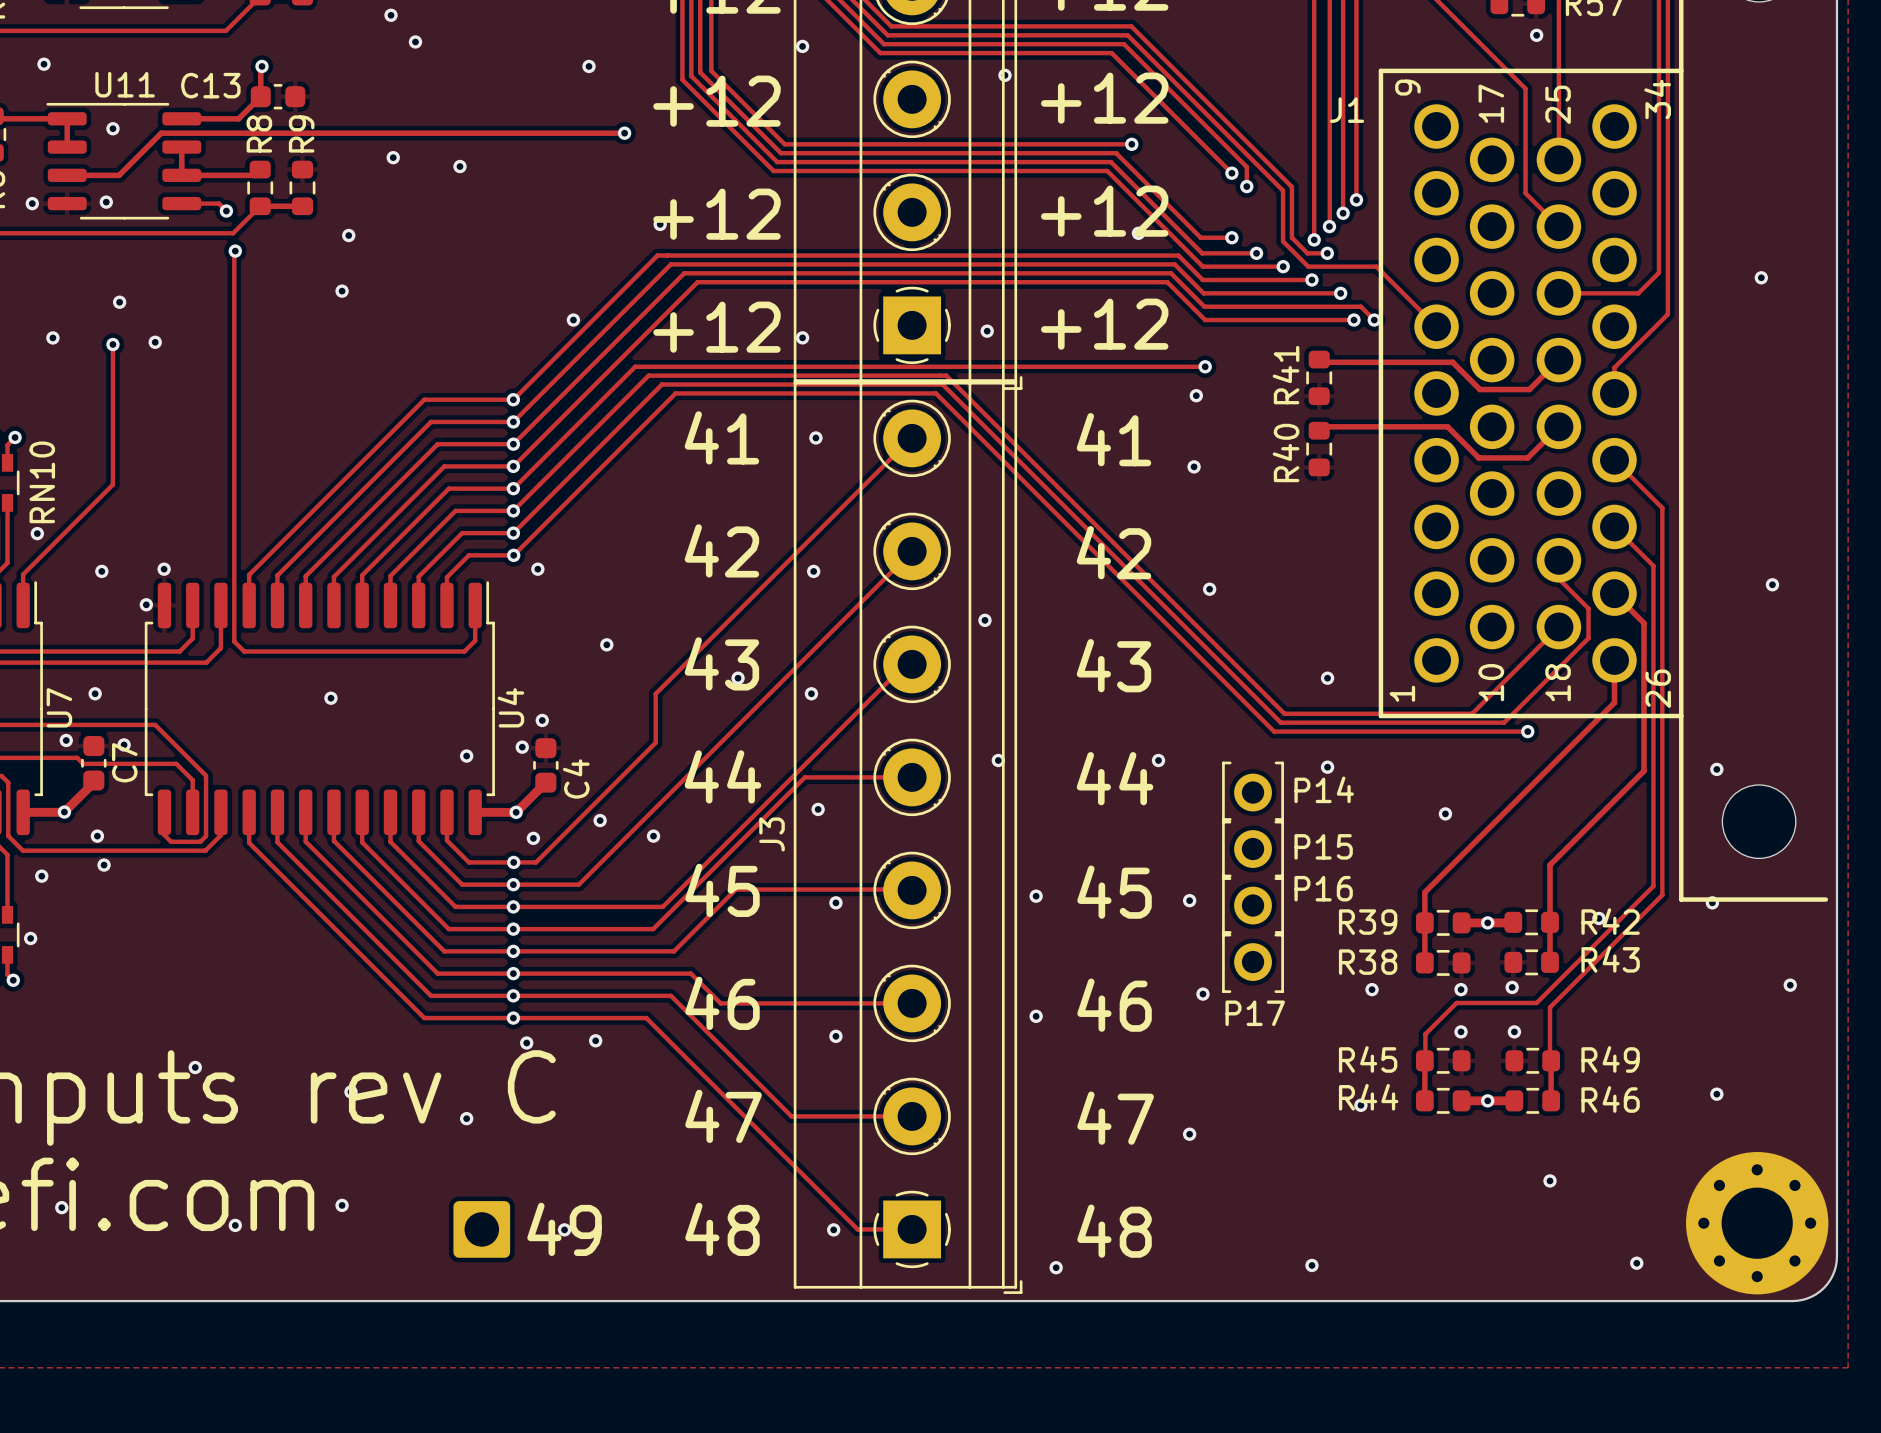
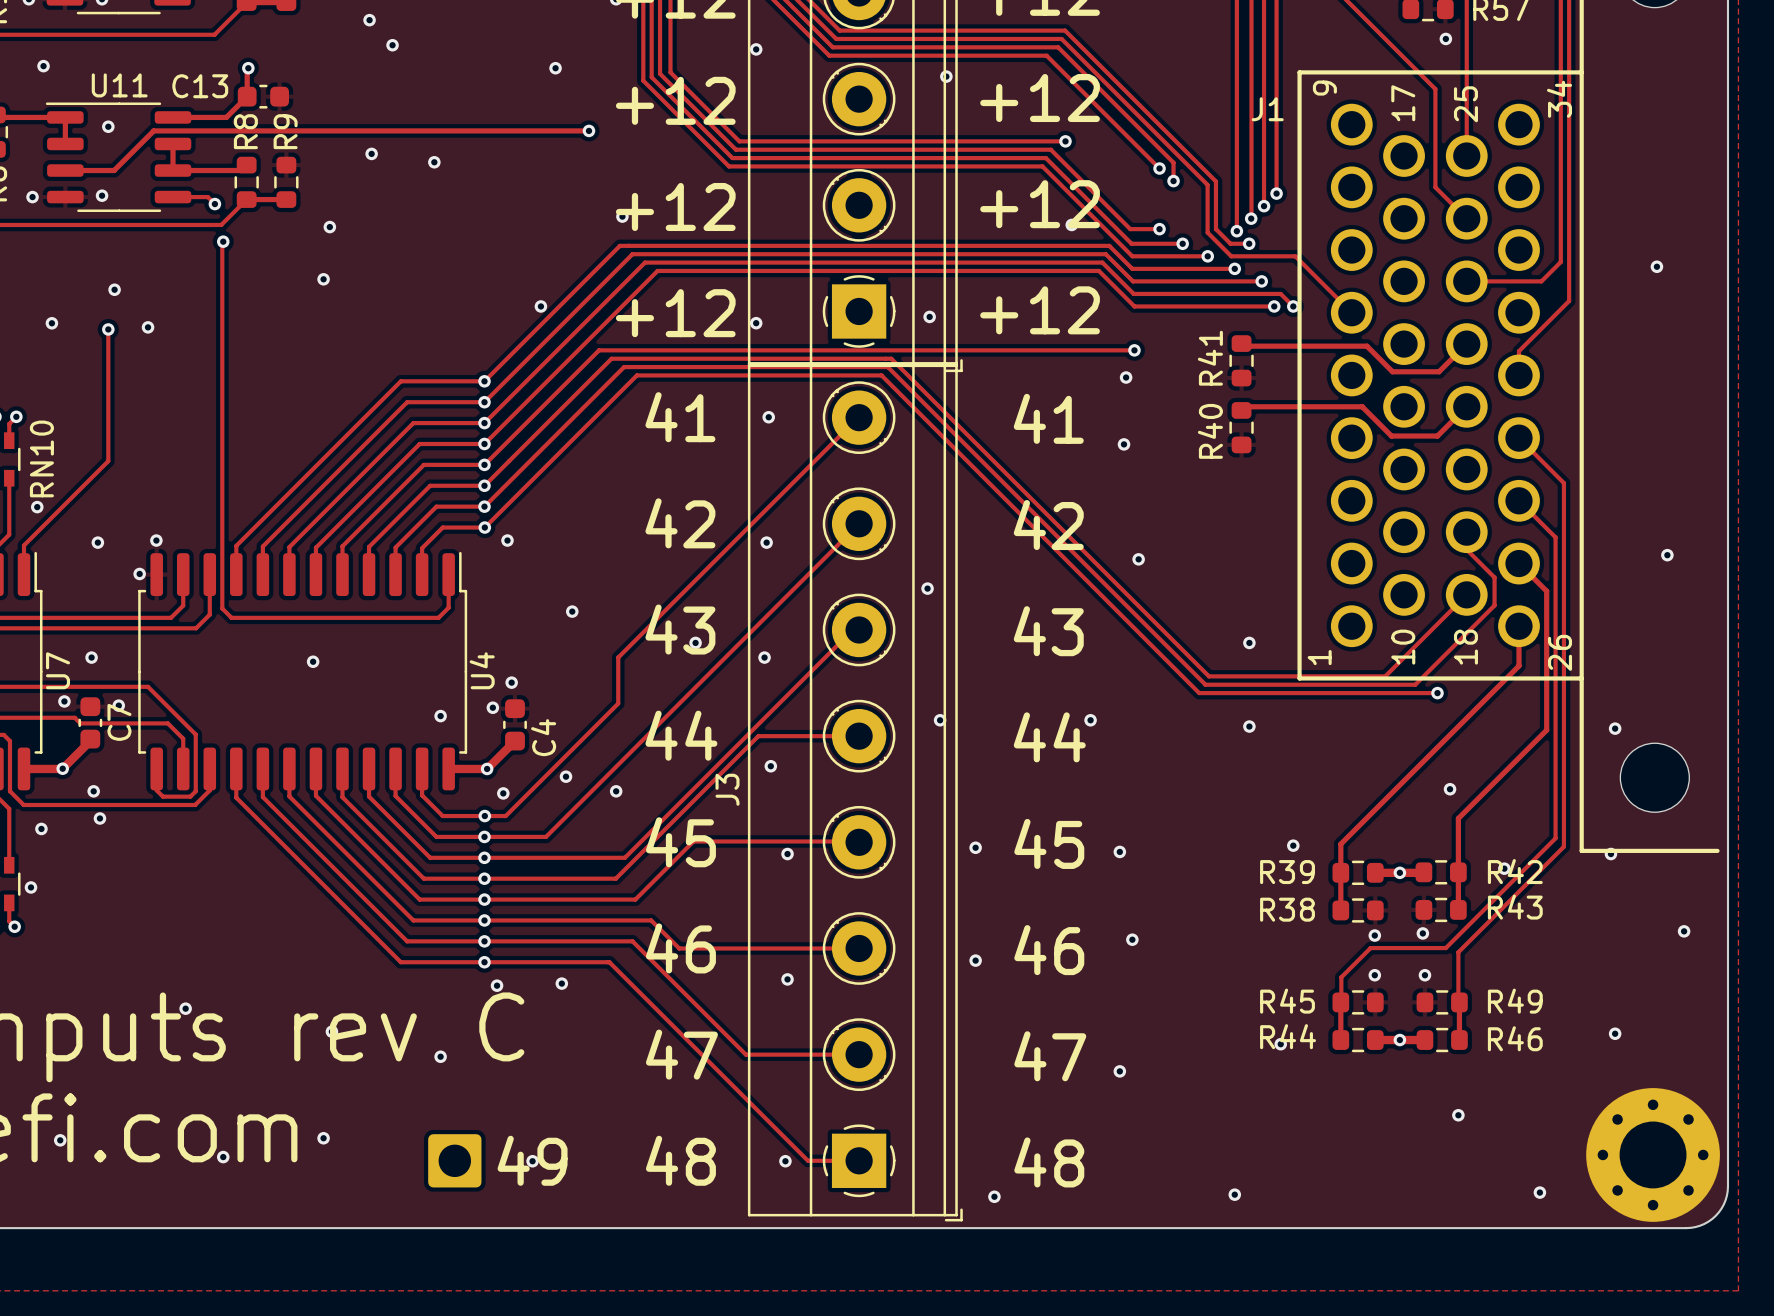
P14: (1253, 792) -> none
via: (1445, 813) -> none
via: none -> (1450, 789)
P15: (1253, 849) -> none
via: none -> (1293, 845)
P16: (1253, 905) -> none
P17: (1253, 962) -> none
via: (1372, 989) -> none

